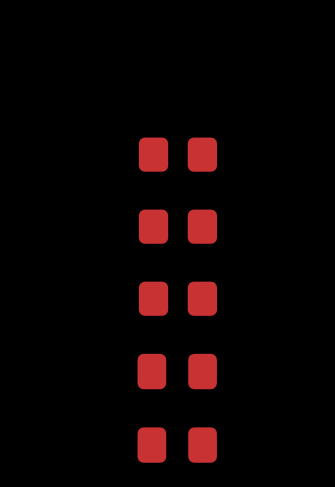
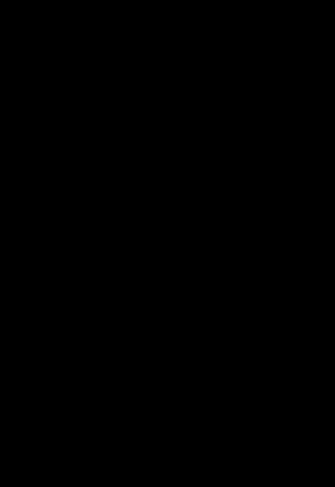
part: (177, 154) -> none
part: (177, 226) -> none
part: (177, 298) -> none
part: (177, 371) -> none
part: (177, 445) -> none

